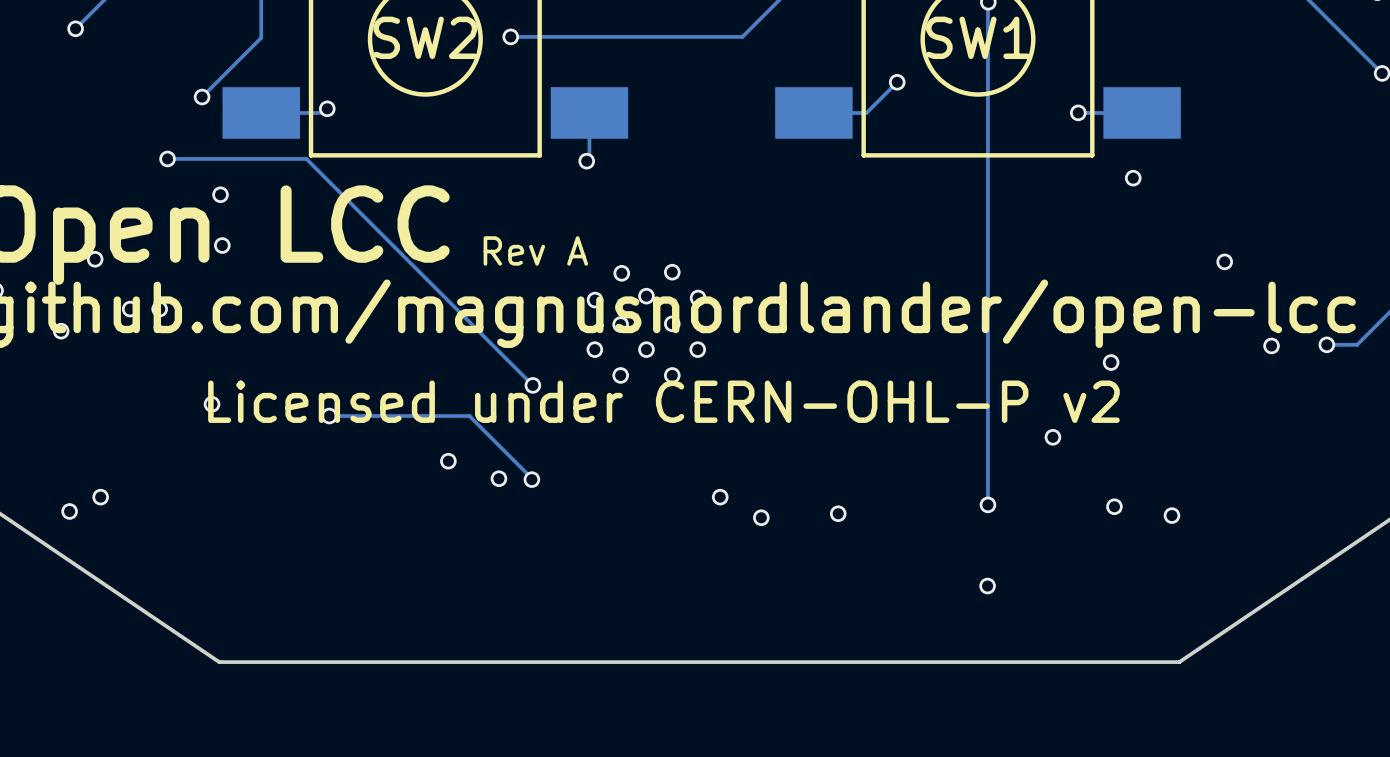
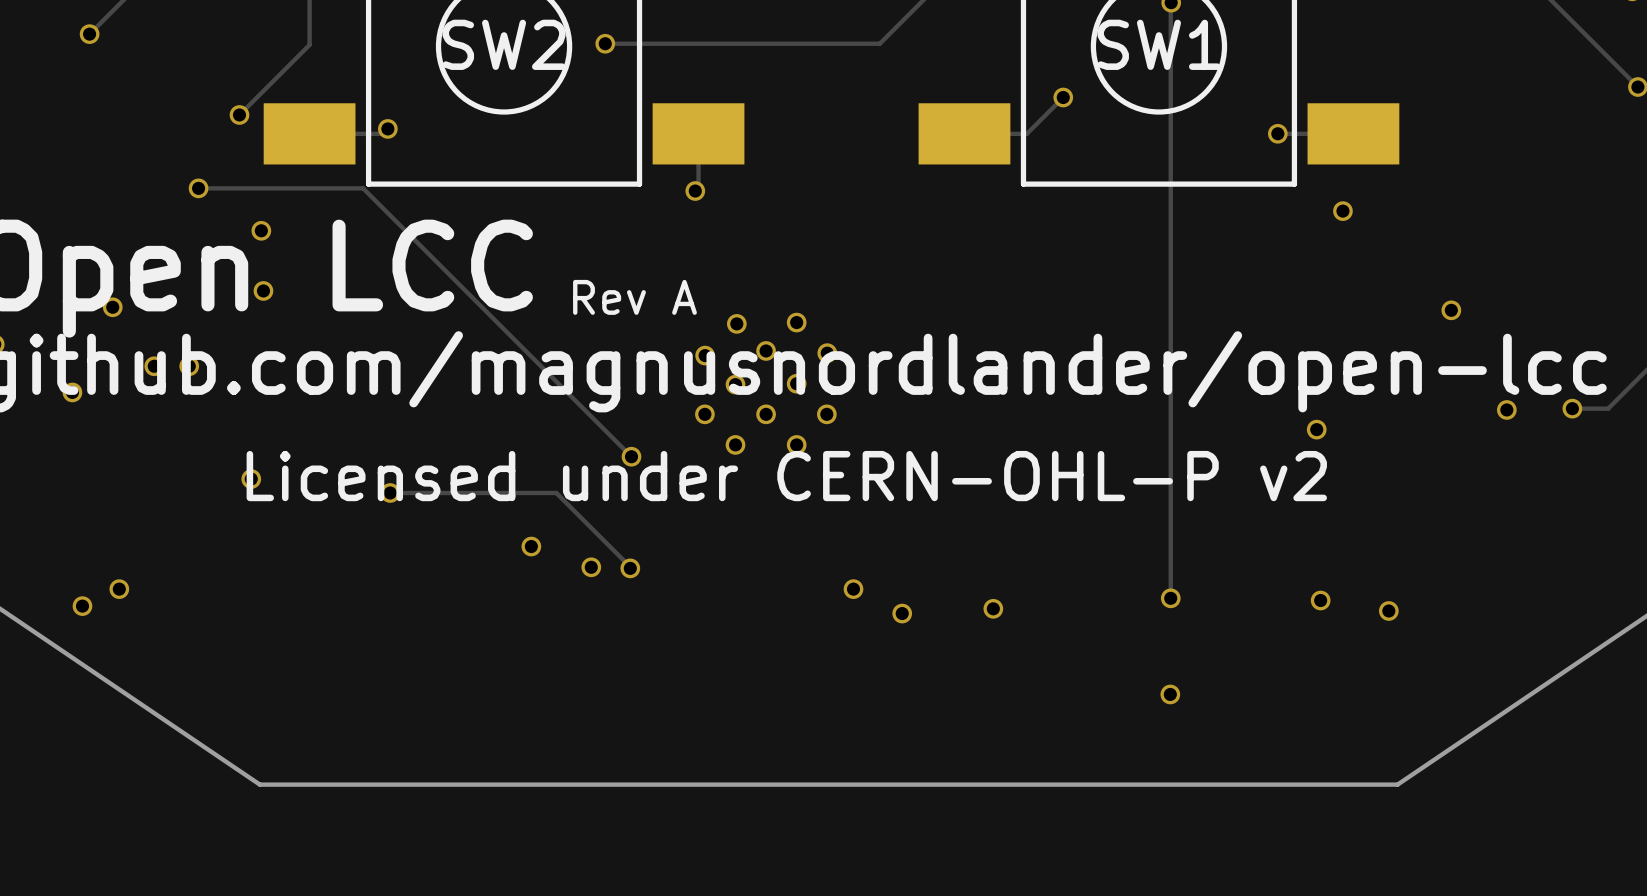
via: (1052, 437) -> none

